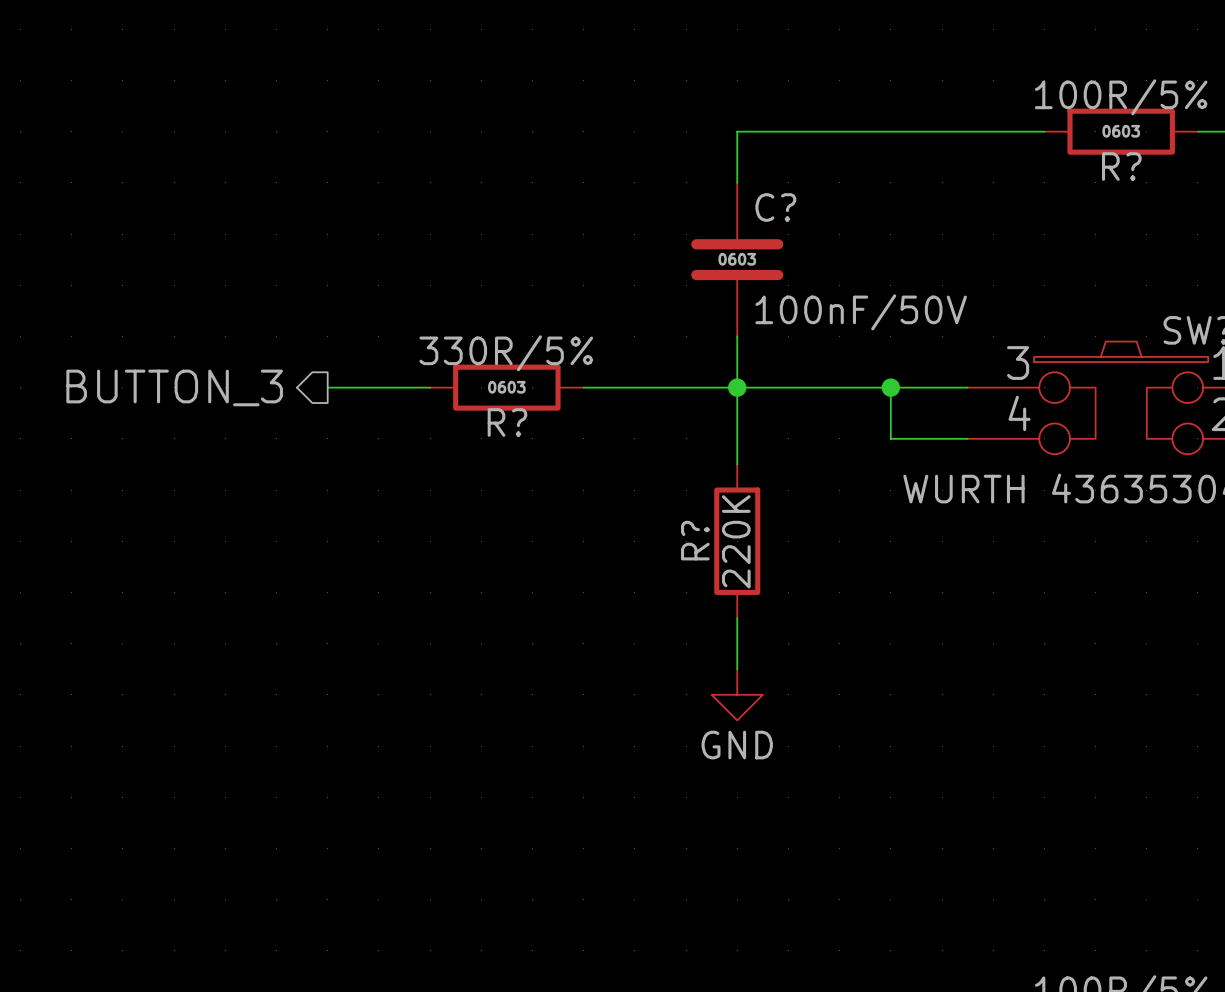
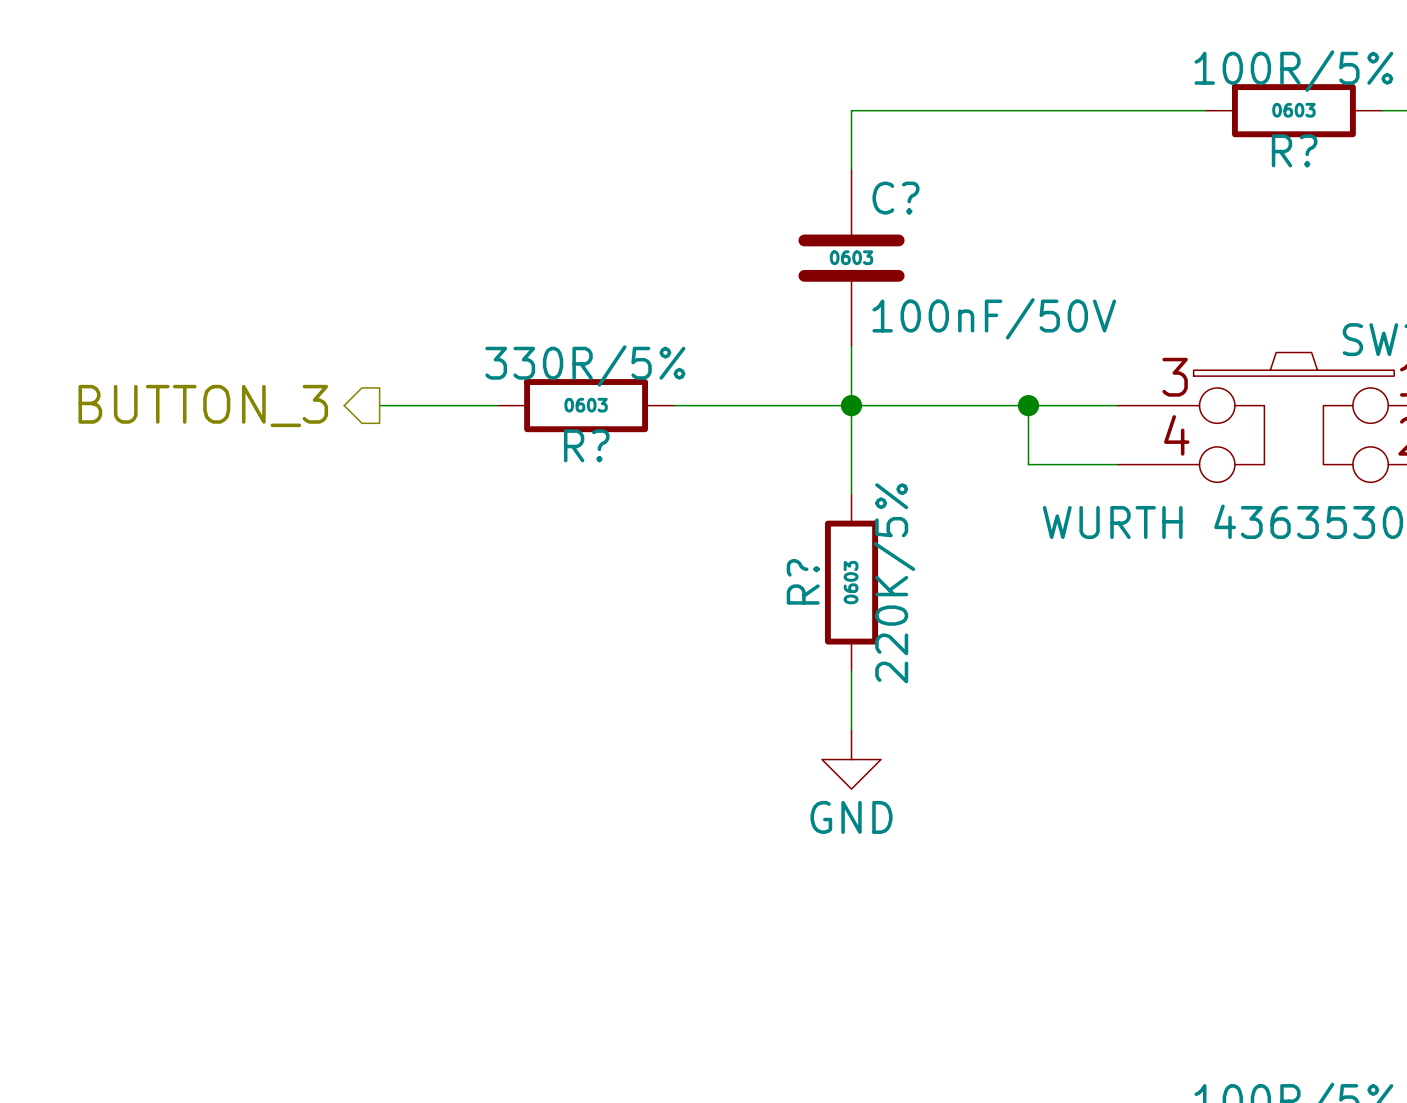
R? text: none -> 0603 (851, 582)
R? value: 220K (736, 541) -> 220K/5% (894, 583)

